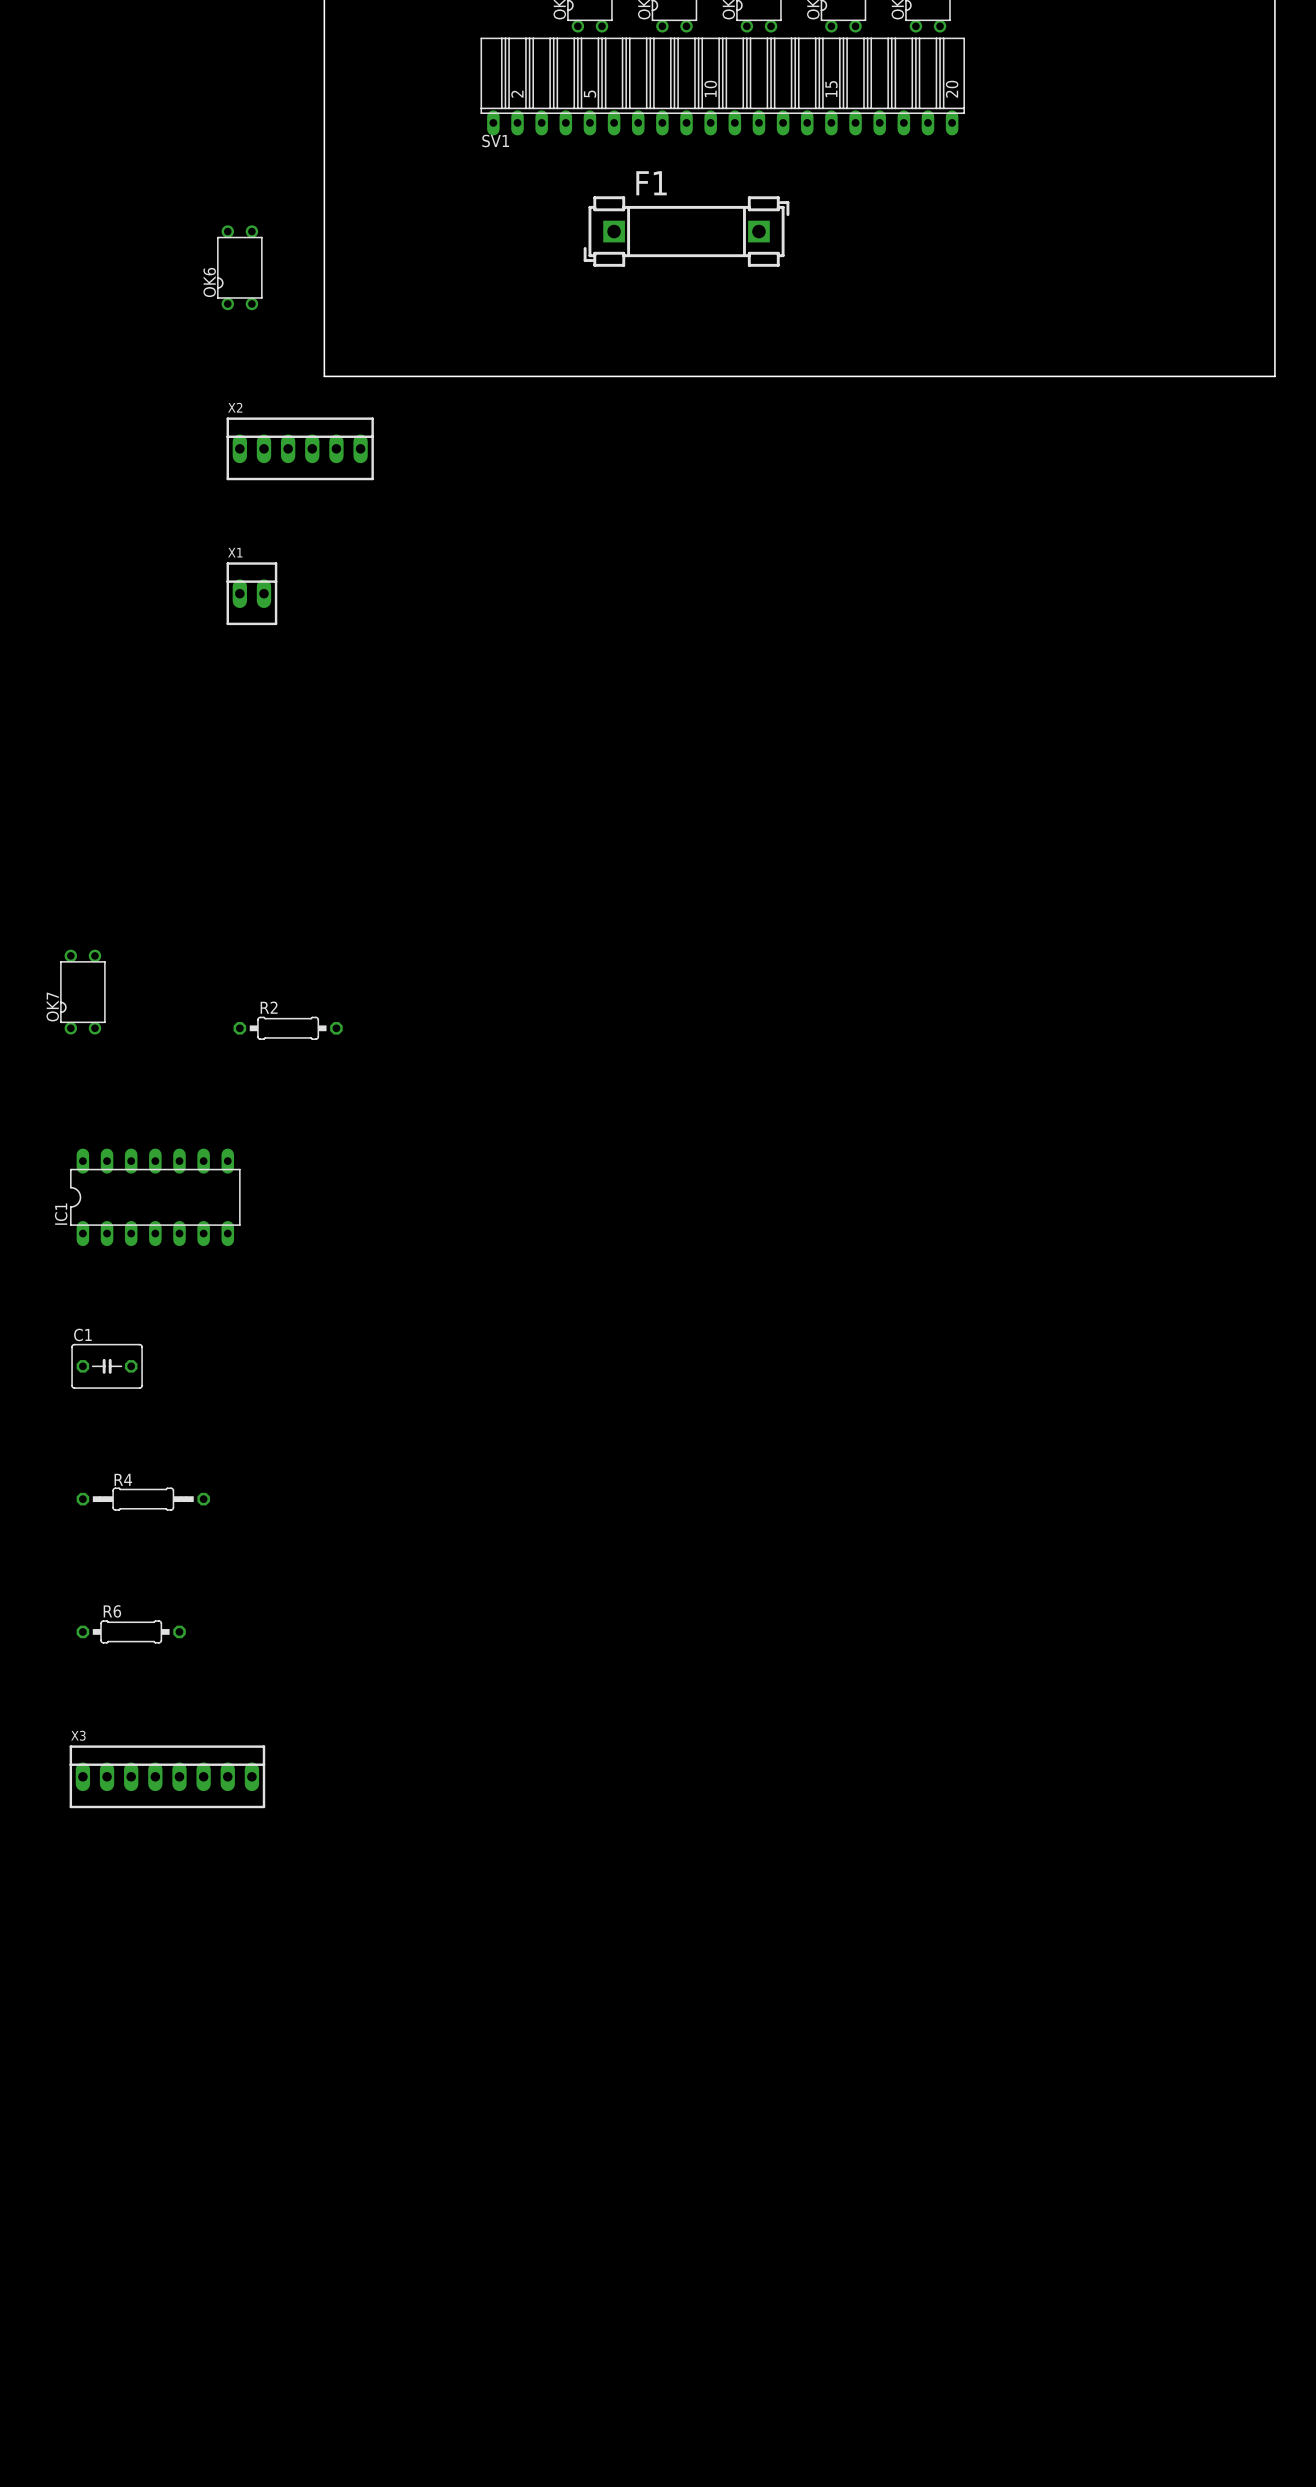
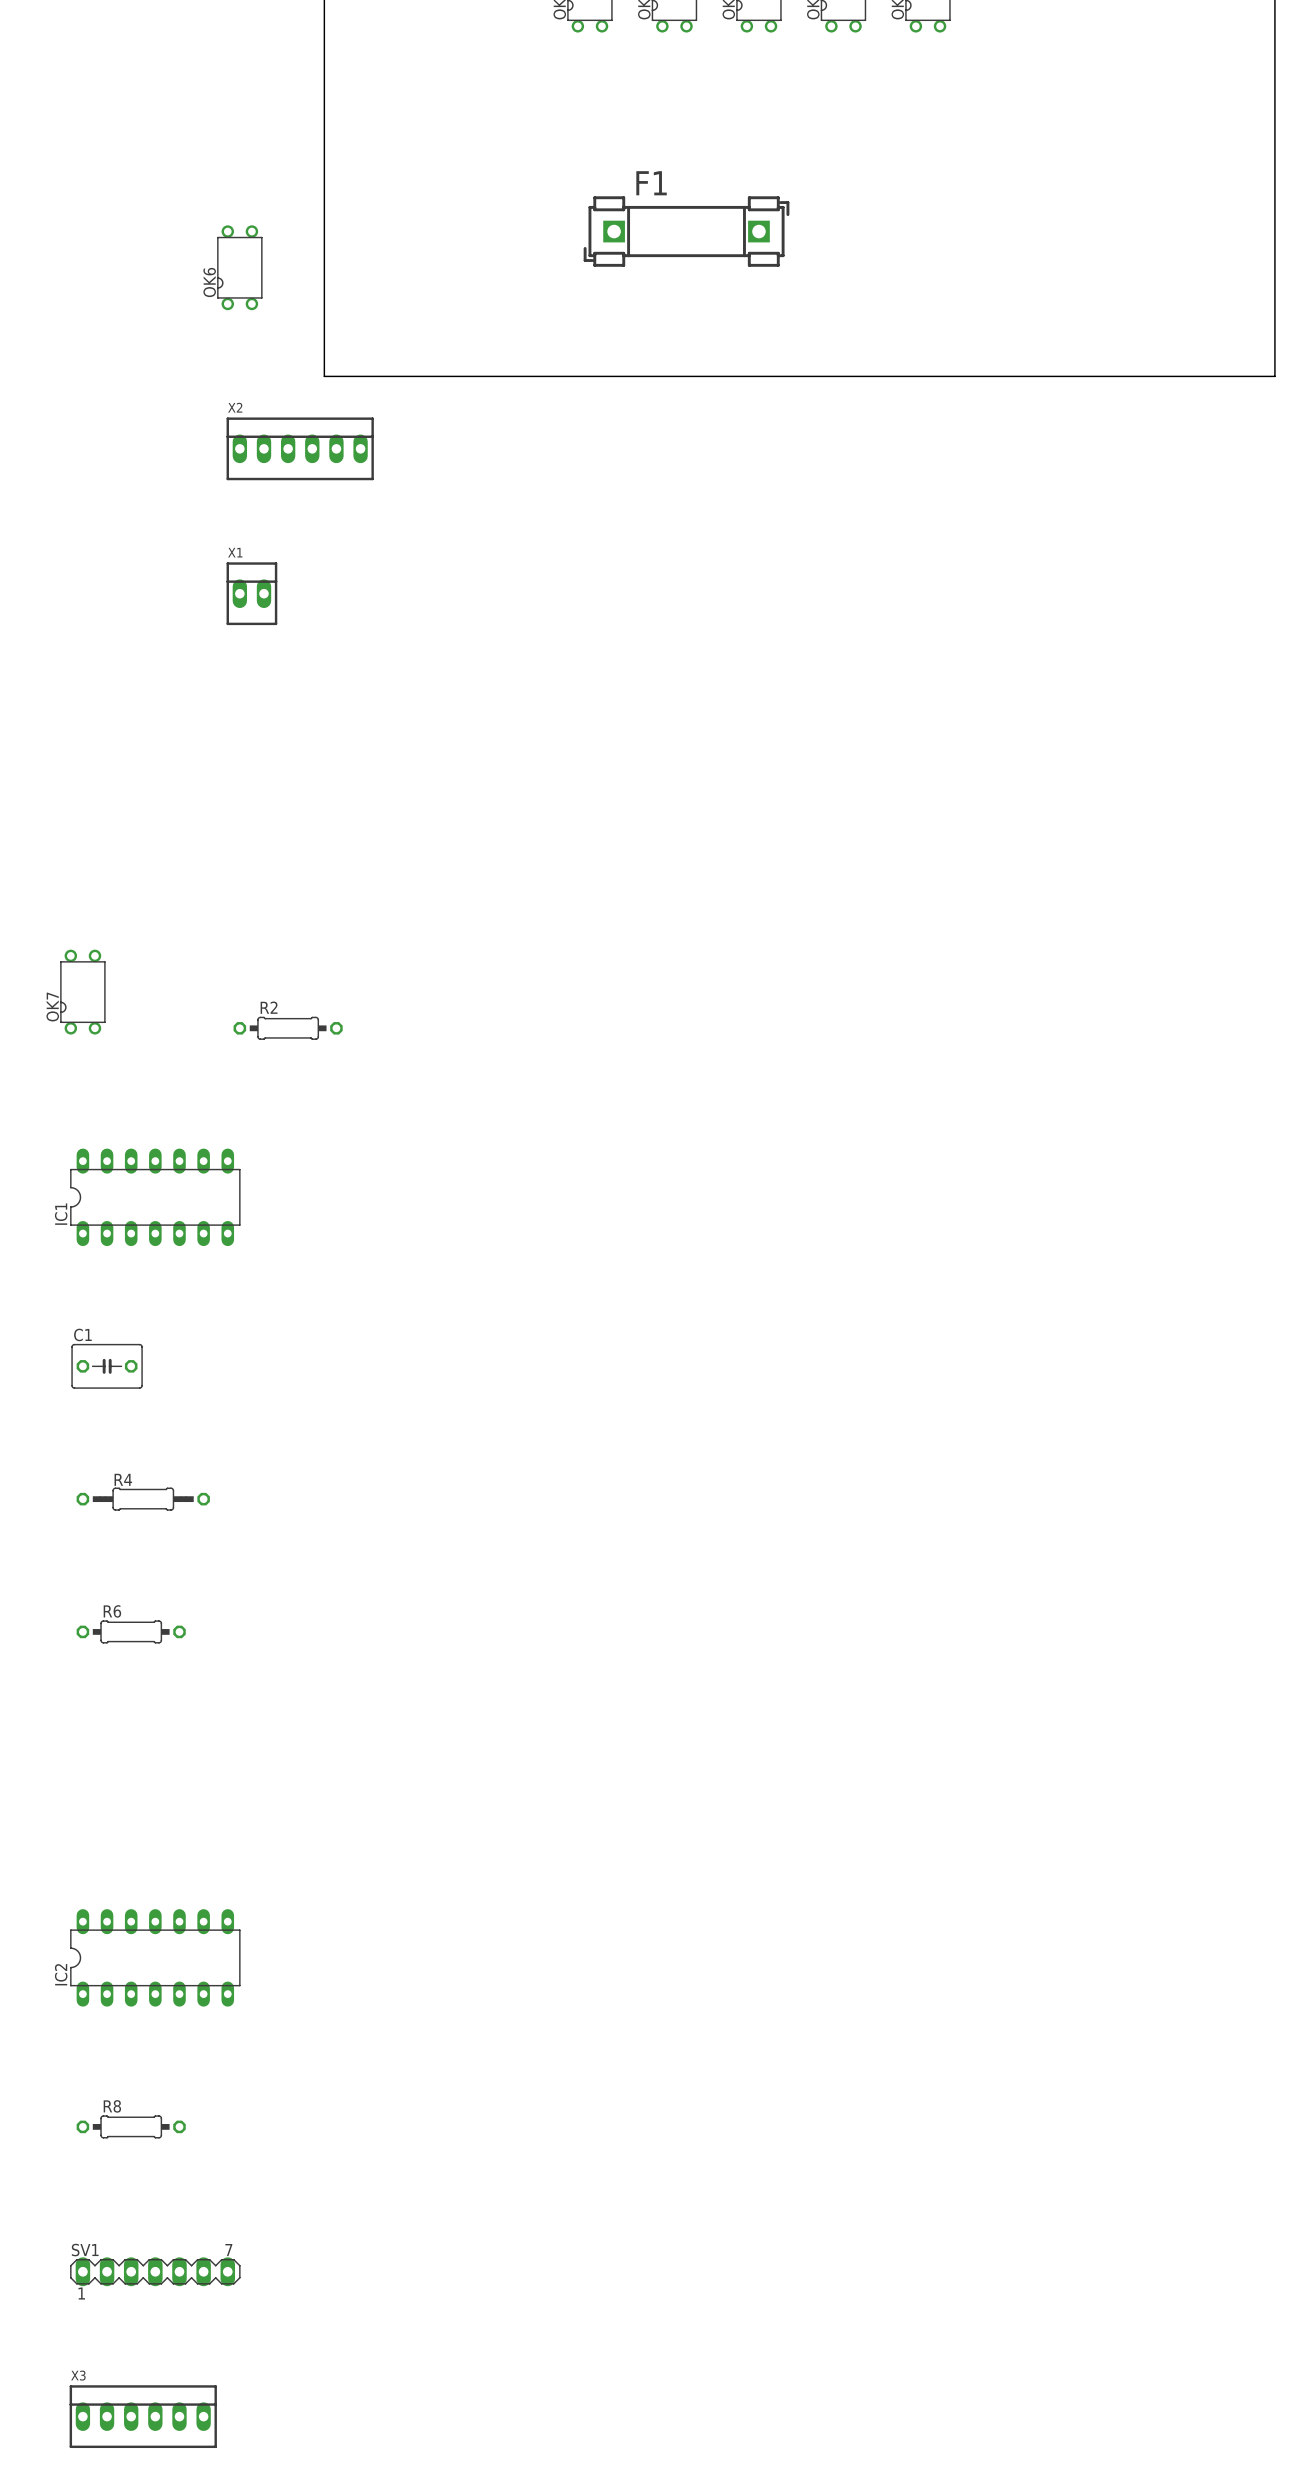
SV1 footprint: [480, 37, 965, 136] -> [70, 2257, 241, 2287]
SV1 name position: SV1 (495, 141) -> SV1 (85, 2250)
X3 name position: X3 (78, 1735) -> X3 (78, 2375)
X3 footprint: [69, 1745, 266, 1809] -> [69, 2385, 217, 2449]
IC2: none -> (155, 1957)
R8: none -> (131, 2126)

